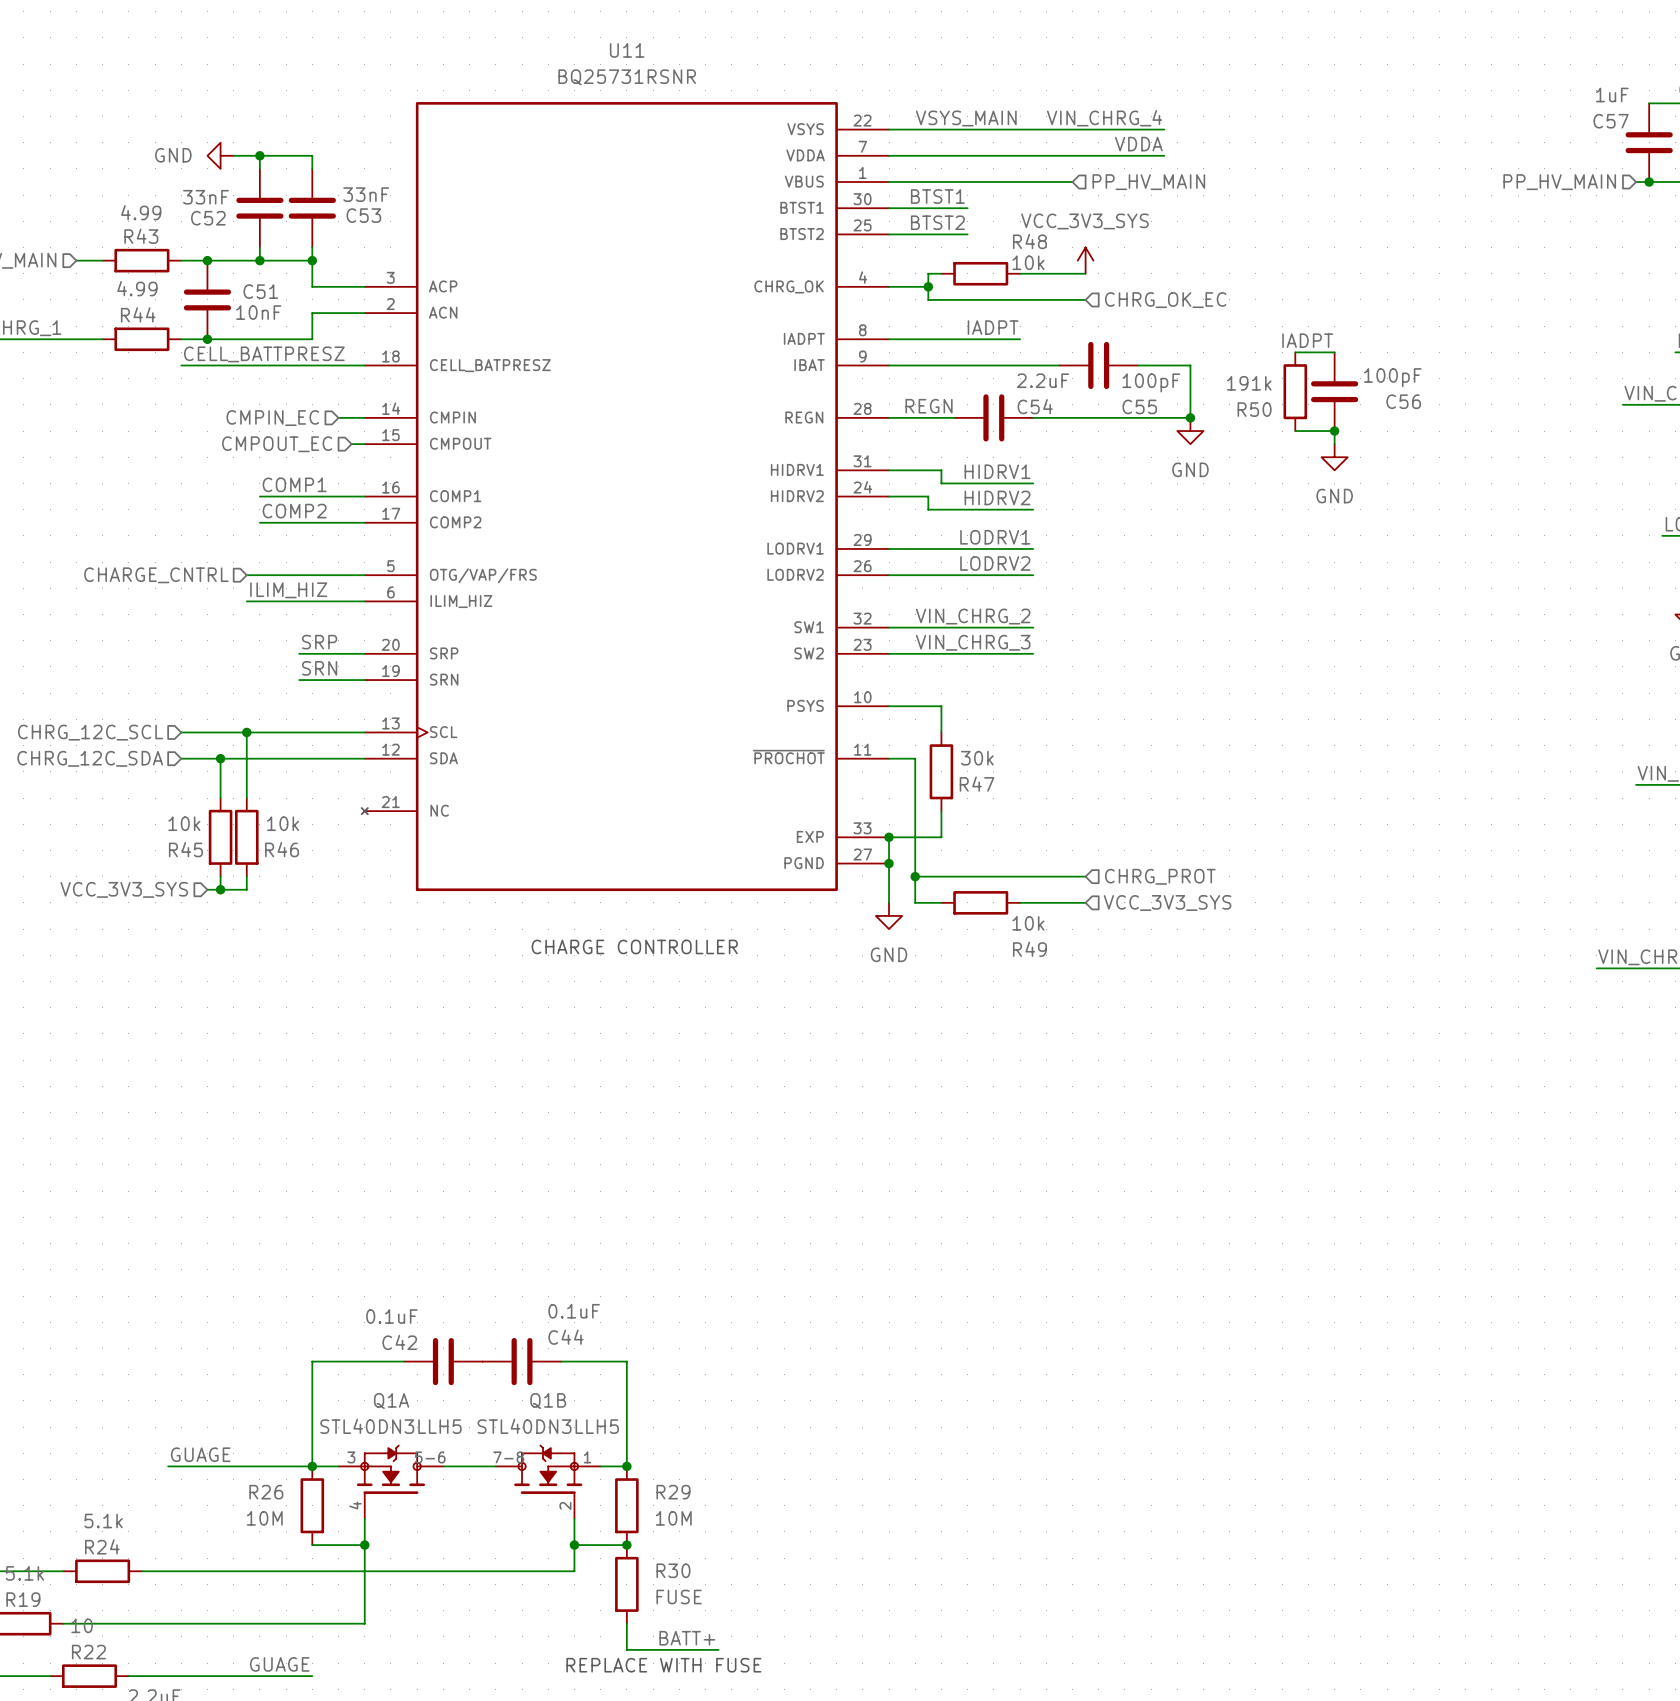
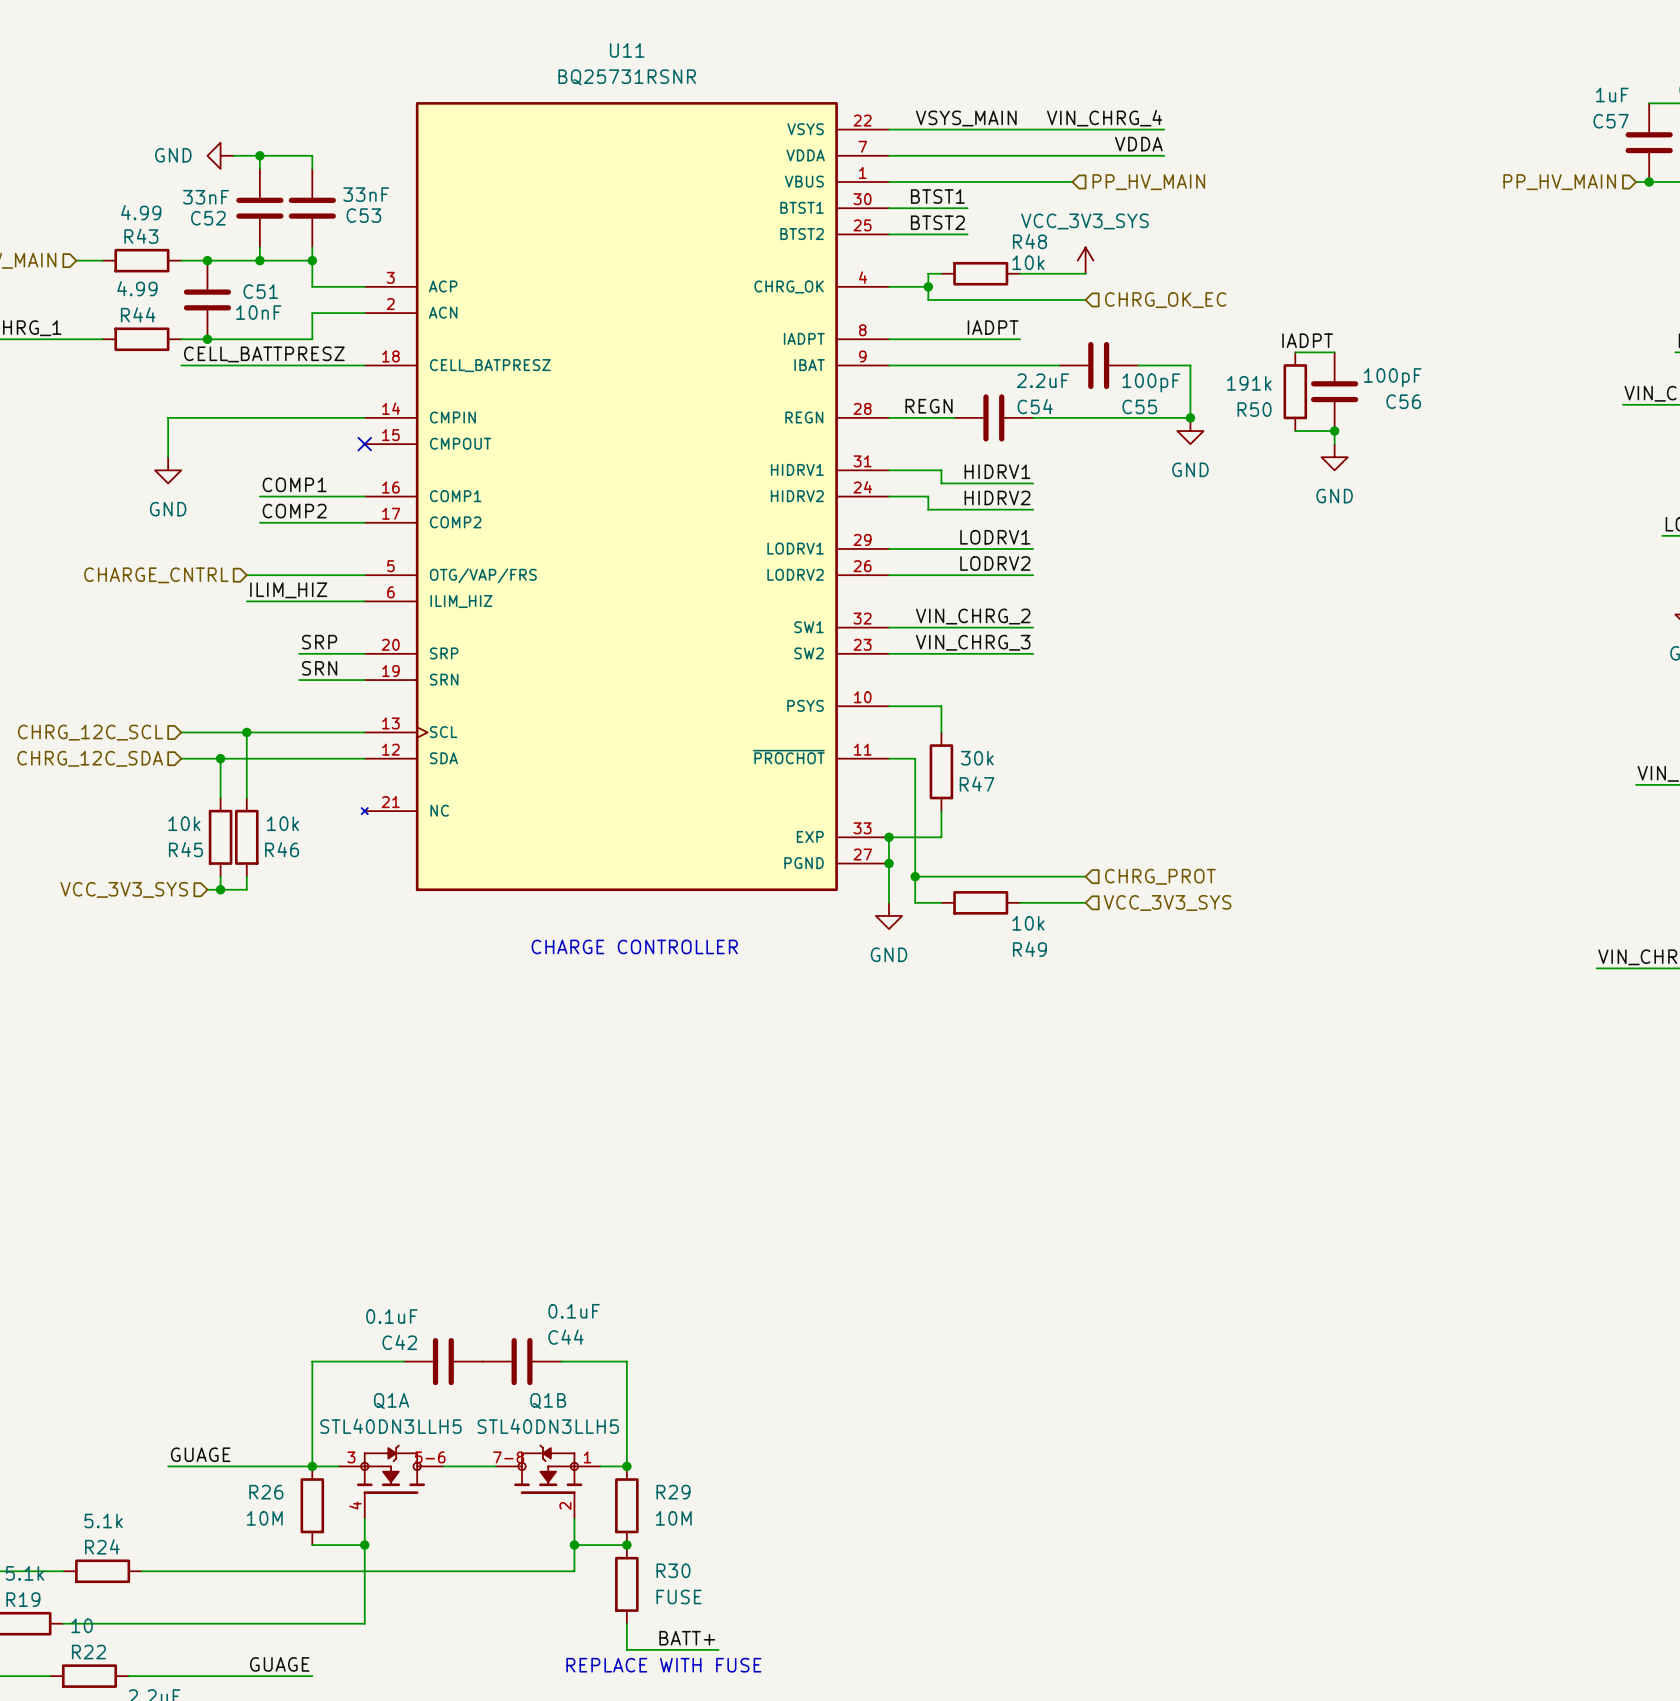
wire: none -> (338, 417) (168, 417) (168, 457)
hierarchical label: CMPIN_EC (272, 418) -> none
hierarchical label: CMPOUT_EC (277, 444) -> none
wire: (351, 444) (364, 444) -> none
no-connect mark: none -> (364, 444)
power symbol: none -> GND (168, 470)

